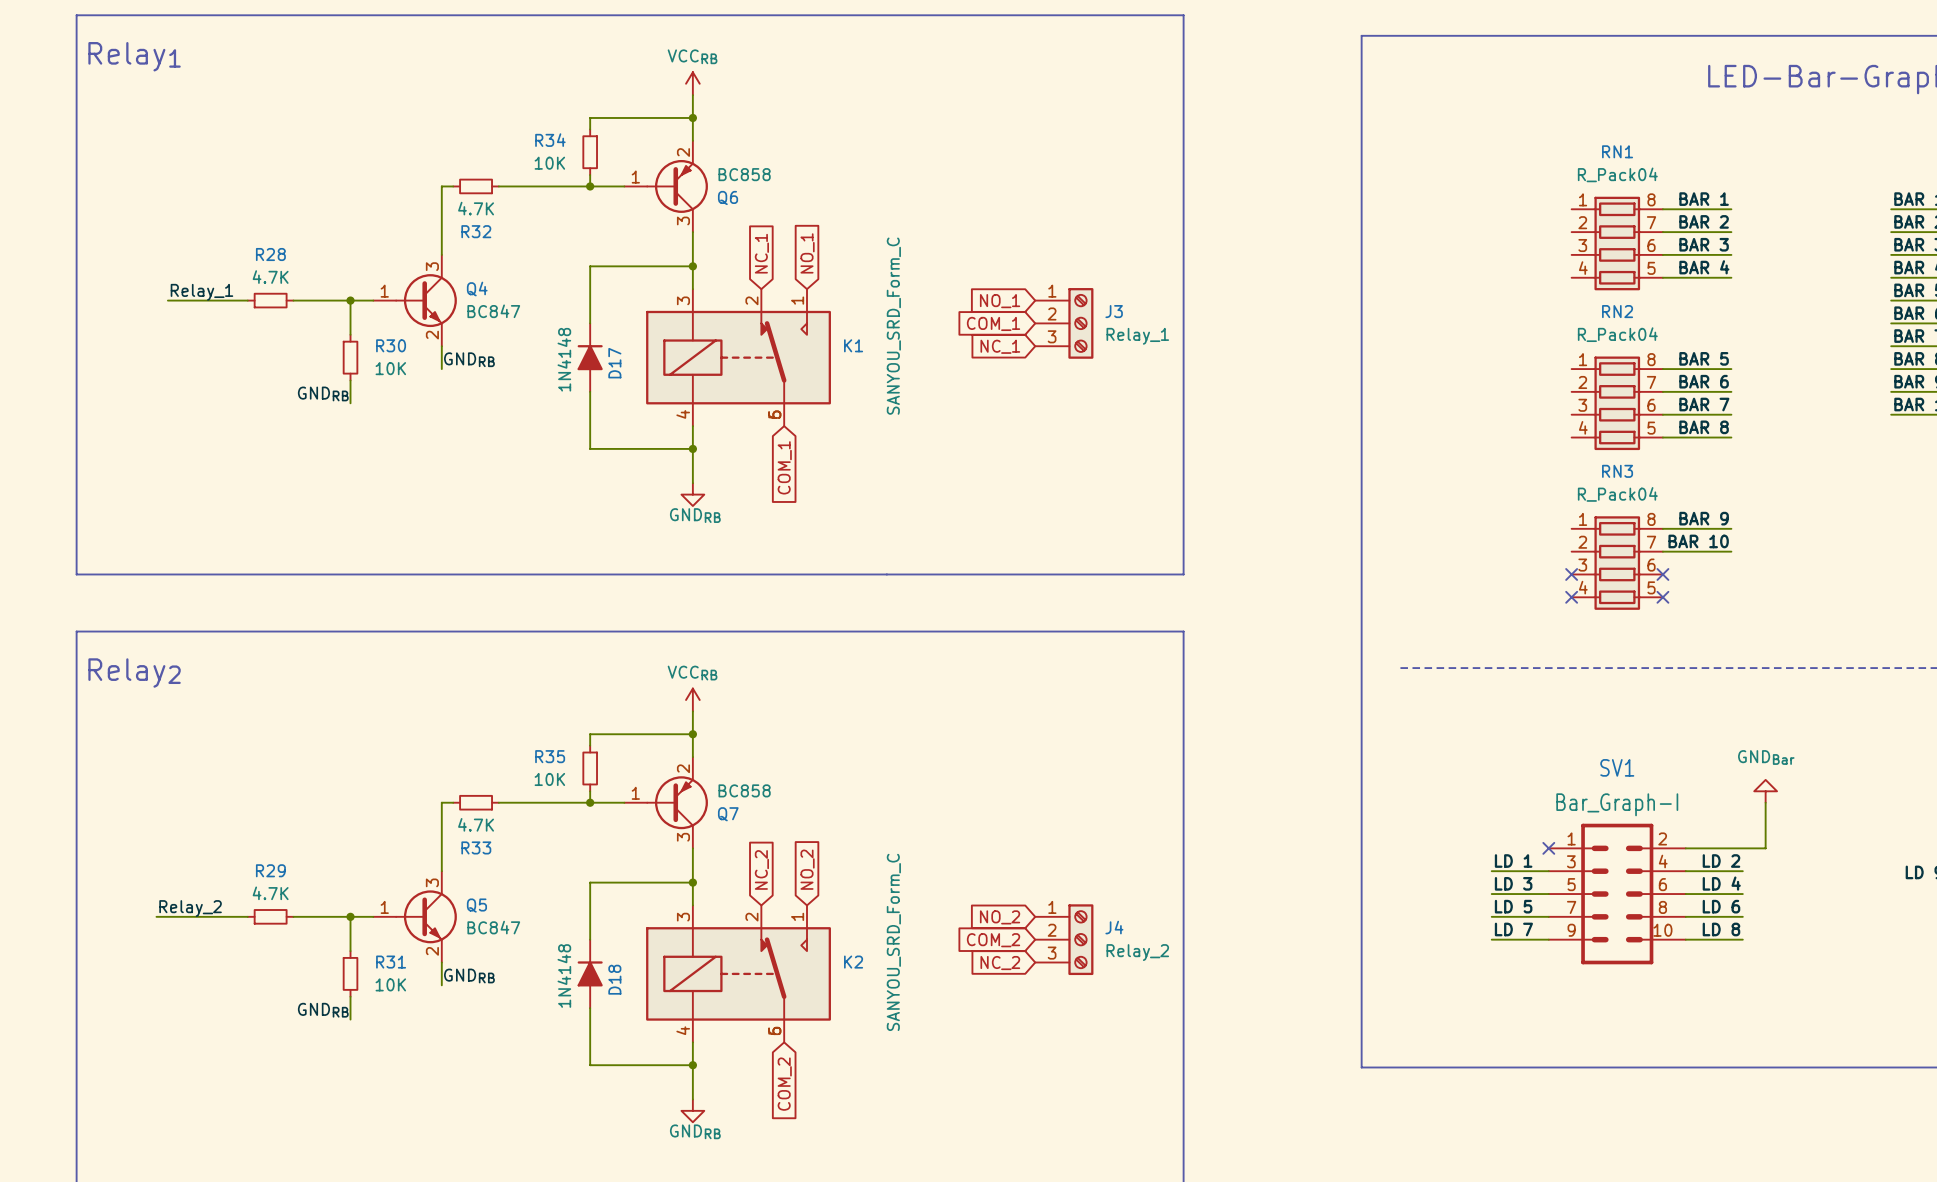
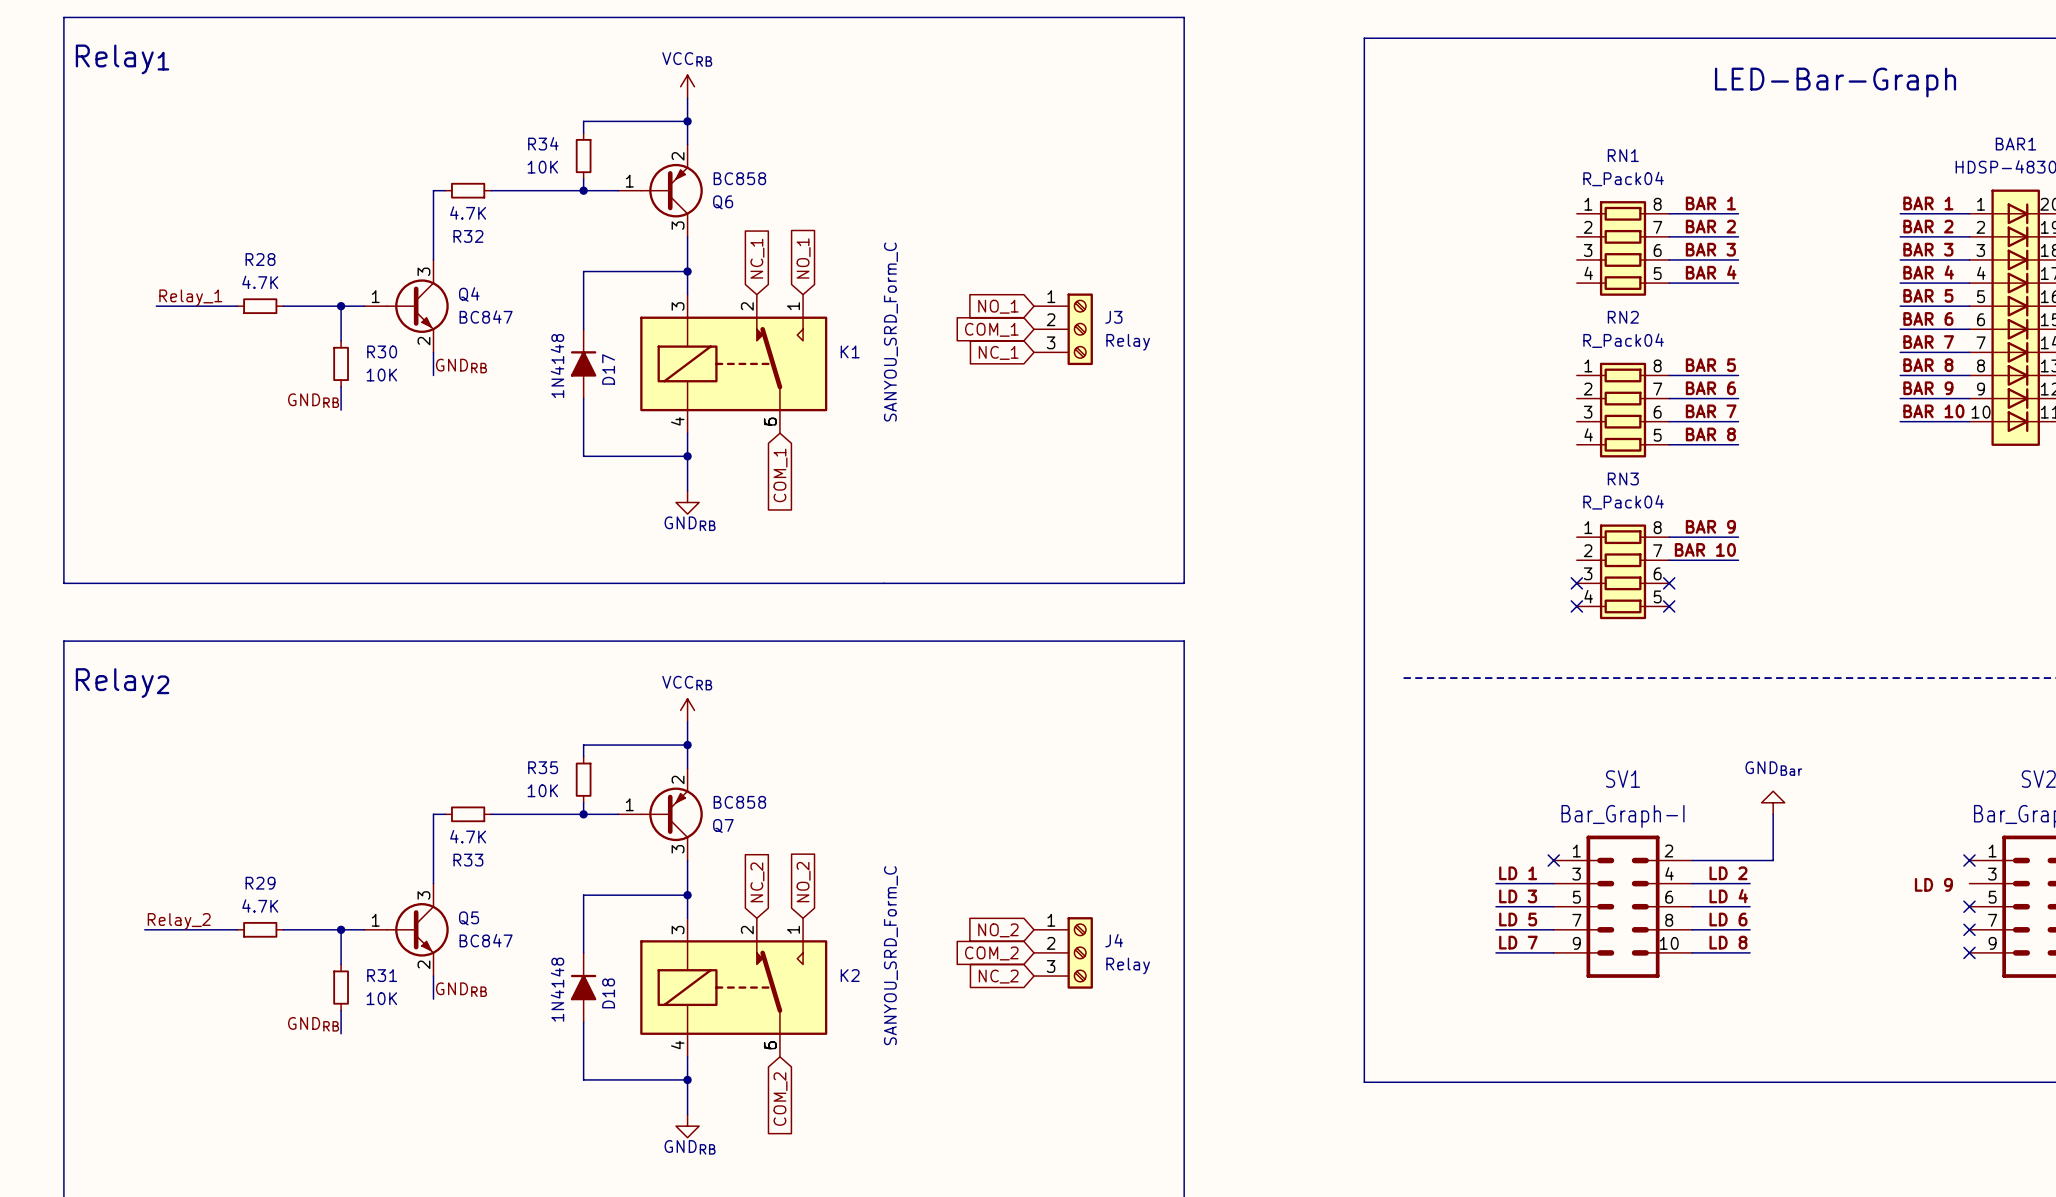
J3 value: Relay_1 (1137, 336) -> Relay (1128, 342)
J4 value: Relay_2 (1137, 952) -> Relay (1128, 965)

